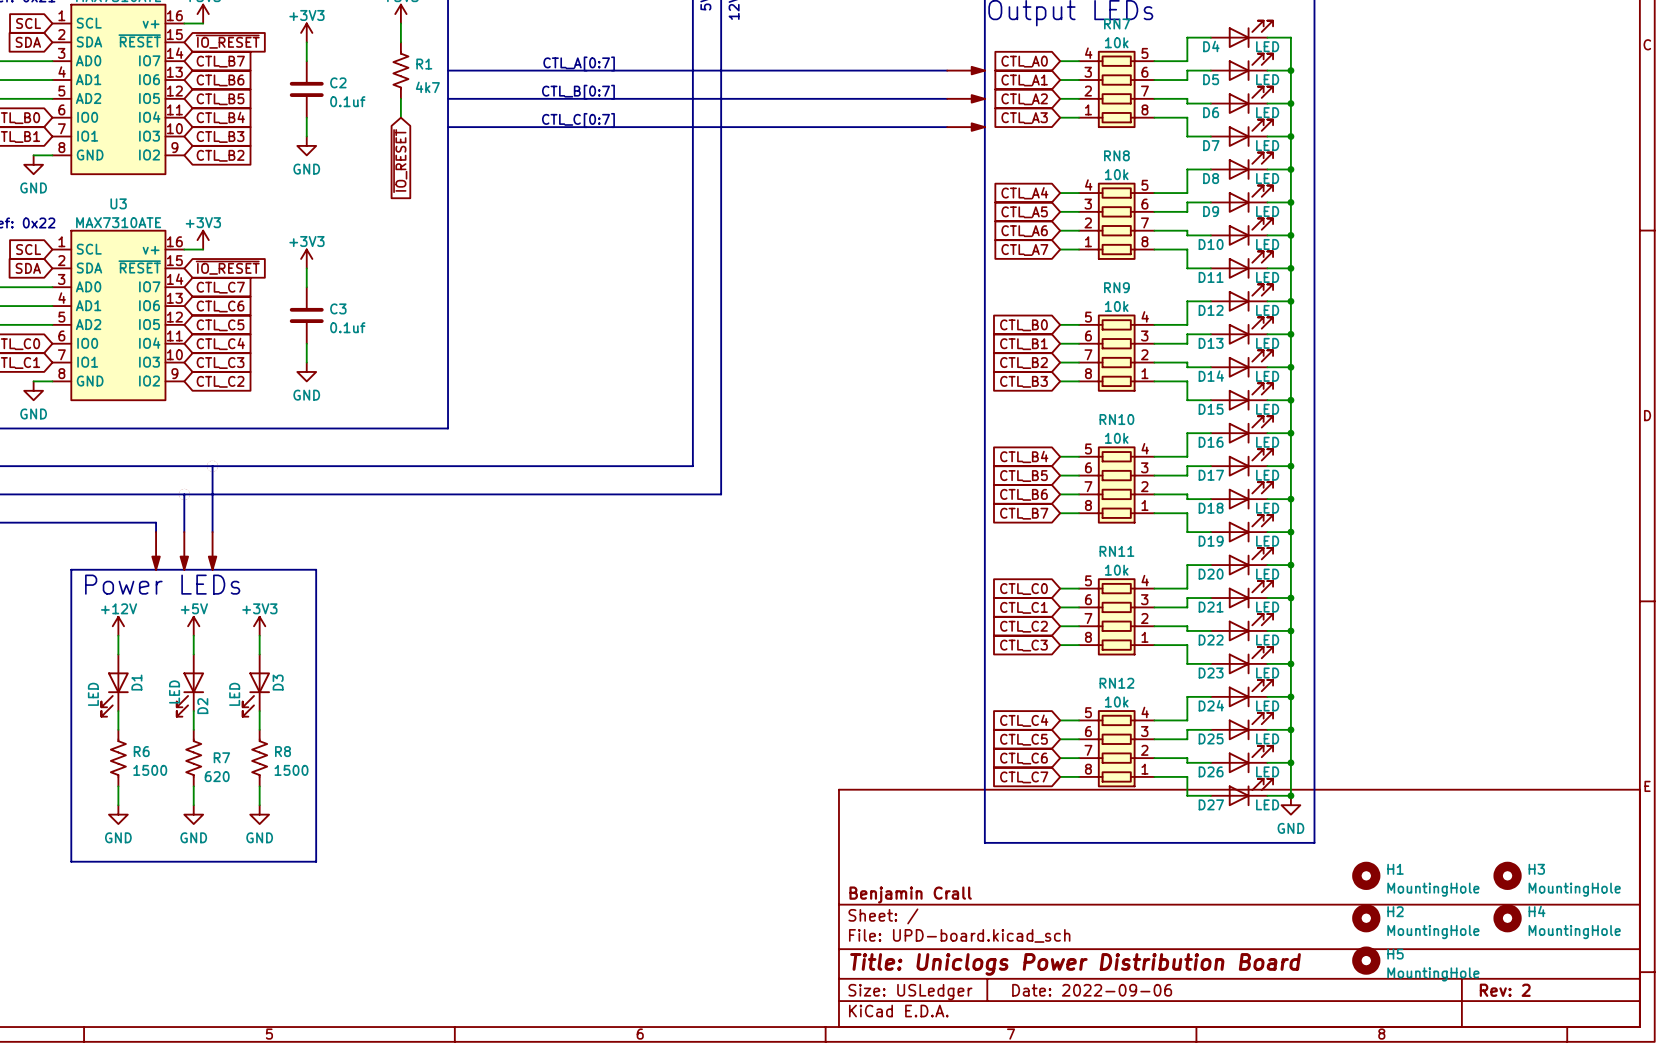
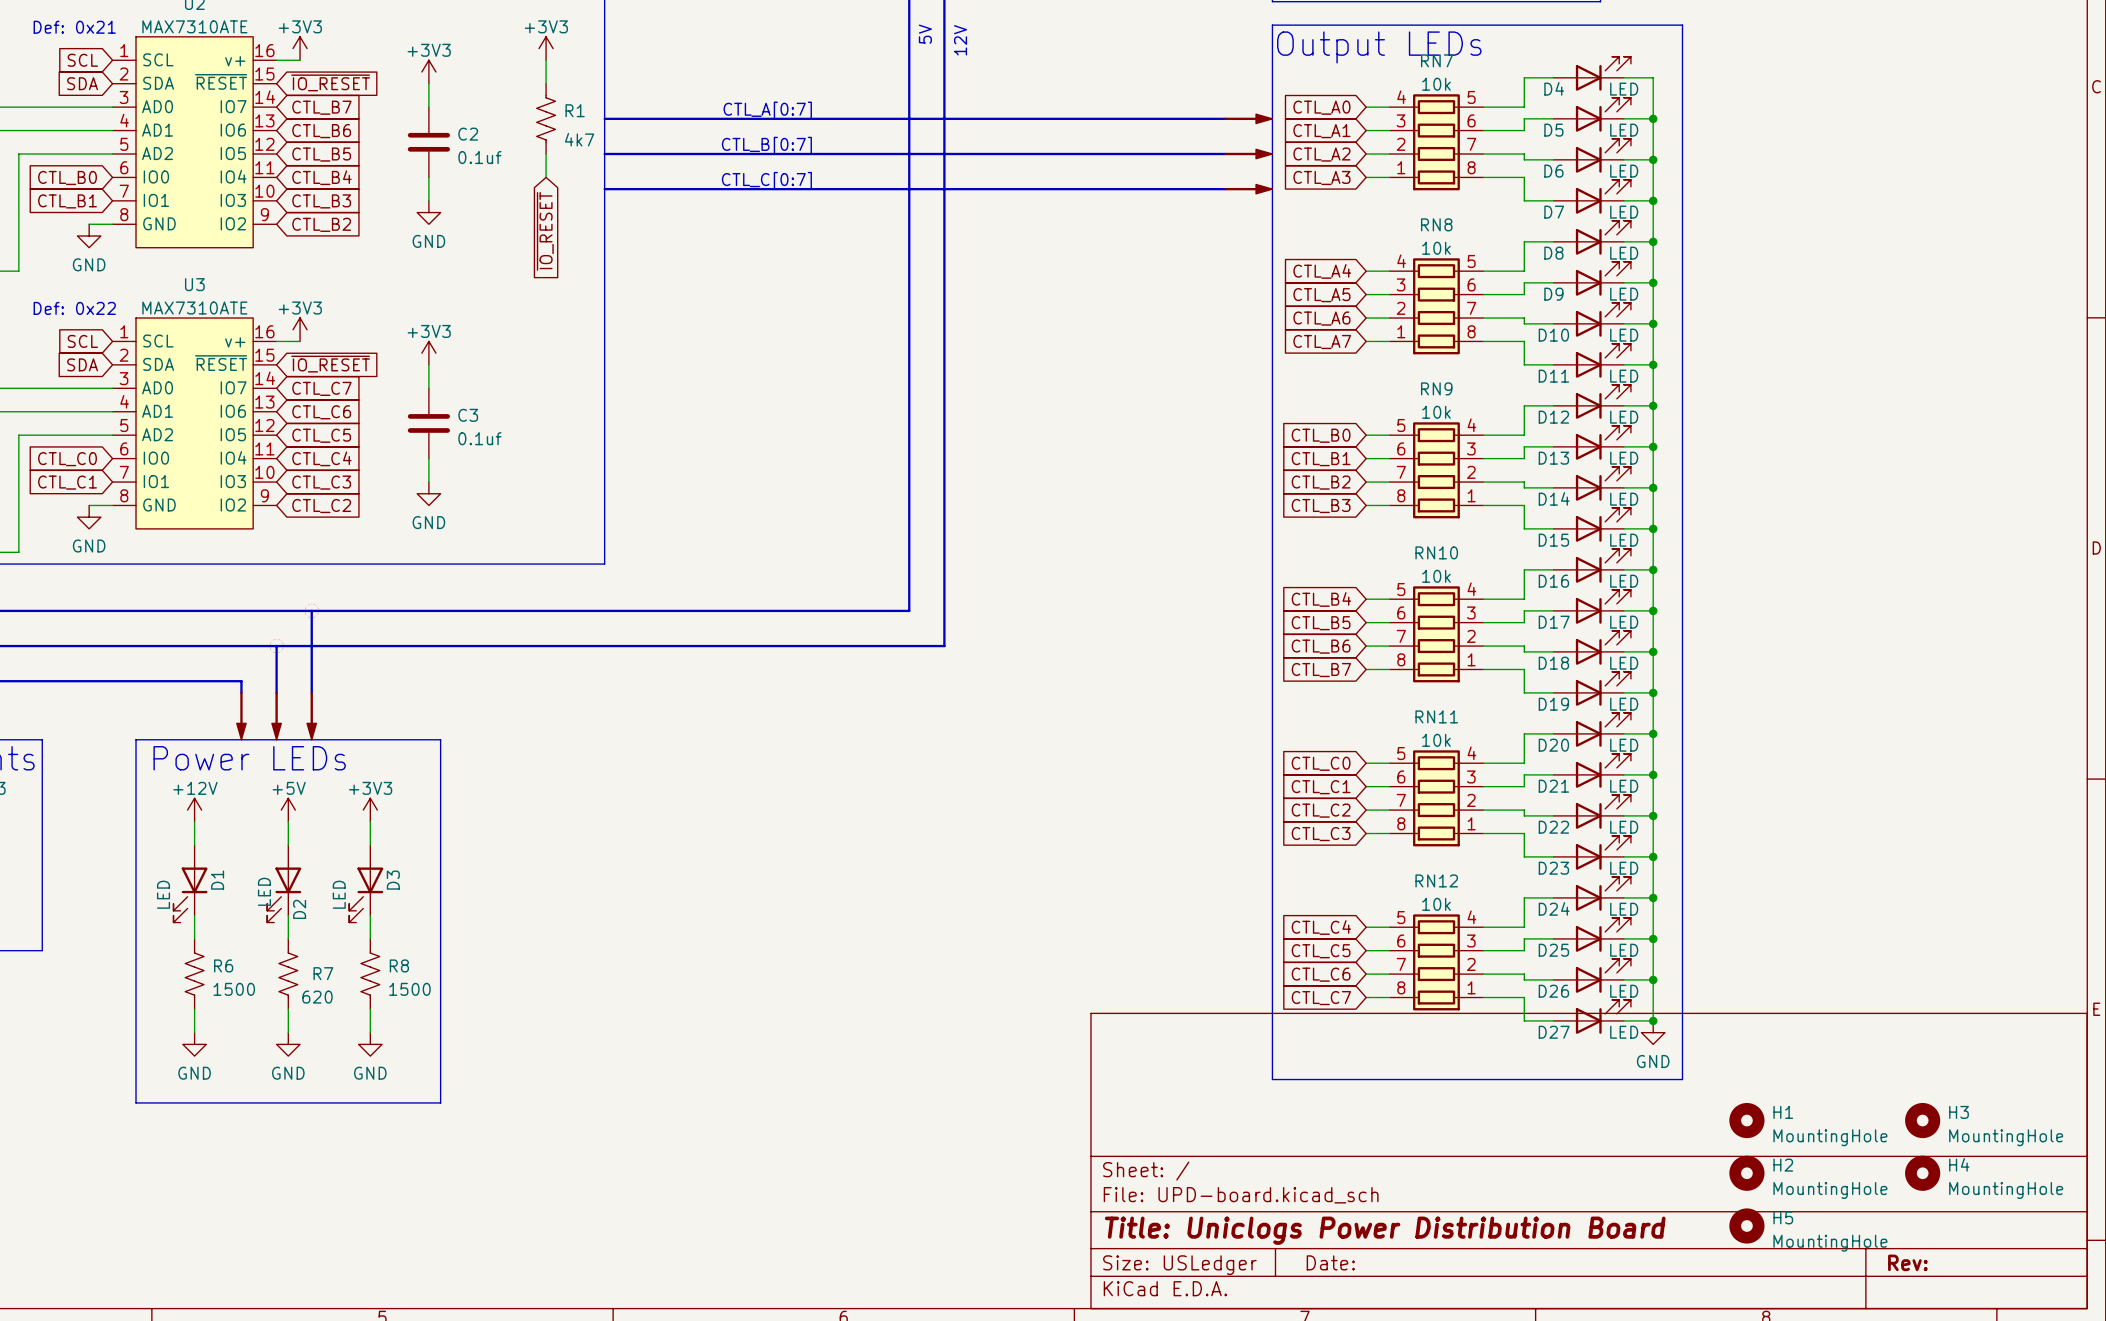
title block: Benjamin Crall (910, 894) -> none
title block: Date: 2022-09-06 (1092, 990) -> Date: (1330, 1262)
title block: Rev: 2 (1505, 990) -> Rev: (1907, 1262)

